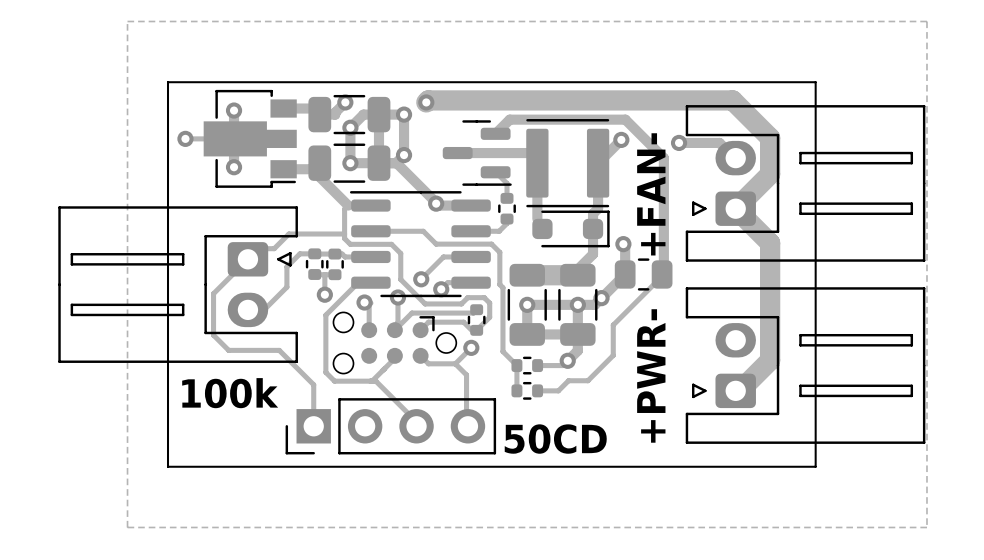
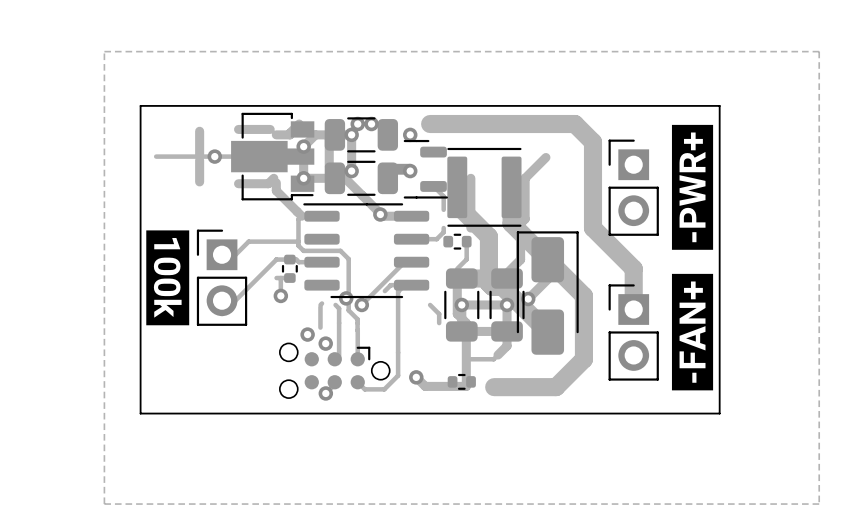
via: (345, 102) -> none
via: none -> (357, 124)
track: (426, 102) (428, 100) (732, 100) (770, 137) (770, 174) (735, 208) (770, 243) (770, 360) (744, 385) -> none
track: none -> (430, 124) (574, 124) (593, 142) (593, 228) (633, 268) (633, 309)
drawing: none -> [671, 124, 714, 250]
via: (234, 110) -> none
part: (349, 114) -> none
part: none -> (361, 134)
via: none -> (410, 134)
track: (495, 133) (509, 119) (625, 119) (663, 158) (663, 264) -> none
via: (185, 138) -> none
part position: (250, 138) -> (272, 156)
via: none -> (214, 156)
via: (621, 139) -> none
track: (679, 142) (719, 142) (734, 158) -> none
via: (679, 142) -> none
track: (457, 153) (532, 153) -> none
via: none -> (410, 171)
part: (349, 163) -> none
part: none -> (361, 178)
part position: (567, 163) -> (484, 187)
via: (234, 167) -> none
part: none -> (633, 187)
track: none -> (511, 196) (511, 223) (583, 295) (583, 359) (556, 387) (494, 387)
part: (805, 183) -> none
track: none -> (457, 205) (488, 236) (488, 283) (492, 286) (502, 286) (547, 332)
text: +FAN- (651, 194) -> none
part rotation: 0° (507, 208) -> 90° clockwise (457, 241)
part position: (507, 208) -> (457, 241)
drawing: none -> [146, 230, 190, 326]
part: (570, 228) -> none
track: (370, 231) (423, 231) (436, 244) (491, 244) (499, 252) (499, 284) (502, 287) (502, 351) (516, 365) -> none
track: none -> (466, 241) (466, 259) (457, 268)
via: (623, 244) -> none
track: (314, 253) (299, 253) (286, 266) (286, 287) -> (276, 259) (246, 289)
track: none -> (404, 262) (361, 304)
track: (471, 256) (443, 256) (421, 279) -> none
track: (247, 259) (213, 293) (213, 335) (228, 350) (279, 350) (313, 384) (313, 426) -> none
part: (314, 264) -> none
drawing: none -> [671, 273, 714, 391]
part: none -> (222, 277)
part: (643, 274) -> none
track: (400, 279) (425, 303) (461, 303) (467, 297) (484, 297) (489, 303) (489, 317) (476, 330) -> (348, 282) (348, 310) (357, 319) (357, 330)
via: (421, 279) -> none
track: (658, 279) (613, 325) (613, 355) (587, 380) (568, 380) (558, 390) (537, 390) -> none
track: (358, 282) (325, 315) (325, 372) (334, 381) (375, 381) (415, 421) -> none
part: (178, 284) -> none
track: none -> (402, 286) (398, 291) (398, 375) (384, 389) (364, 389) (357, 382)
track: none -> (457, 286) (457, 314) (466, 323) (466, 386) (425, 386) (416, 377)
via: (441, 289) -> none
part: none -> (547, 293)
track: (397, 297) (397, 322) (395, 325) -> none
via: (364, 302) -> none
track: none -> (335, 304) (339, 308) (339, 357)
via: none -> (361, 304)
track: none -> (430, 304) (439, 314) (439, 323)
track: (476, 309) (473, 313) (411, 313) (394, 330) -> none
part: (476, 320) -> none
track: (420, 330) (428, 322) (463, 322) (471, 330) -> none
track: none -> (357, 330) (357, 359)
part: none -> (633, 332)
via: none -> (307, 334)
part position: (394, 343) -> (334, 370)
track: (471, 347) (455, 363) -> none
via: (471, 347) -> none
via: none -> (325, 343)
track: (394, 355) (394, 358) (372, 381) -> none
track: (420, 355) (428, 363) (455, 363) -> none
via: (567, 360) -> none
track: (455, 363) (466, 374) (466, 421) -> none
track: (516, 365) (516, 390) -> none
part: (527, 365) -> none
part: (805, 365) -> none
text: +PWR- (651, 375) -> none
via: none -> (416, 377)
text: 100k (230, 393) -> none
via: none -> (325, 393)
board edge: (168, 426) (168, 466) (815, 466) (815, 426) -> (140, 413) (719, 413)
part: (390, 426) -> none
text: 50CD (555, 439) -> none

